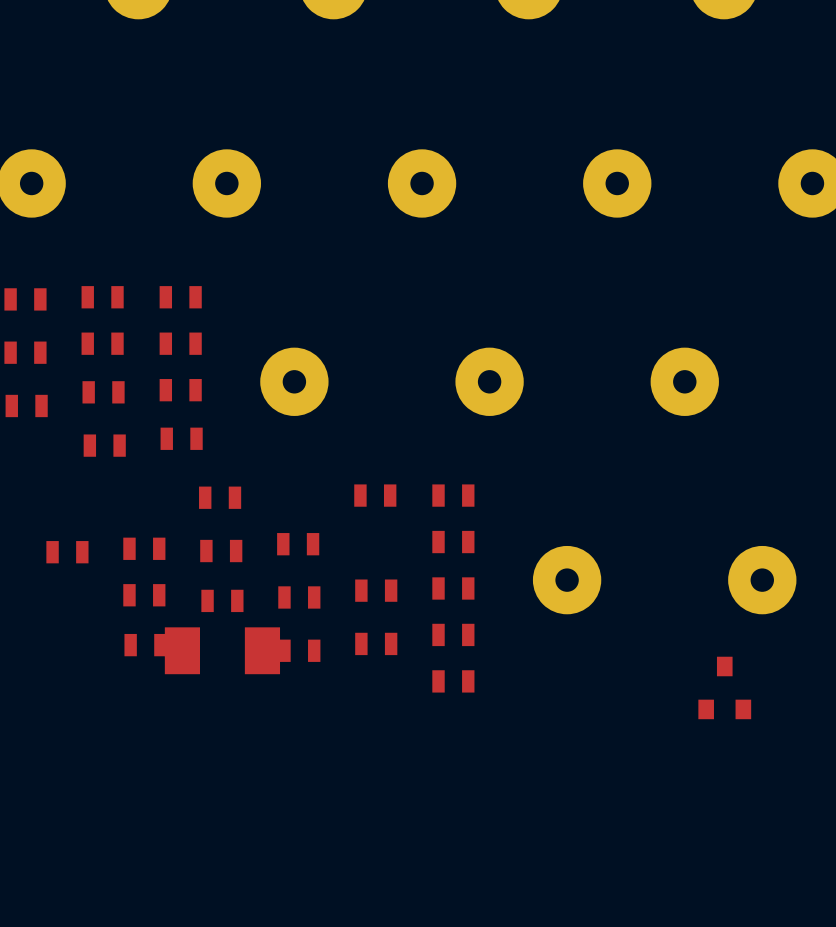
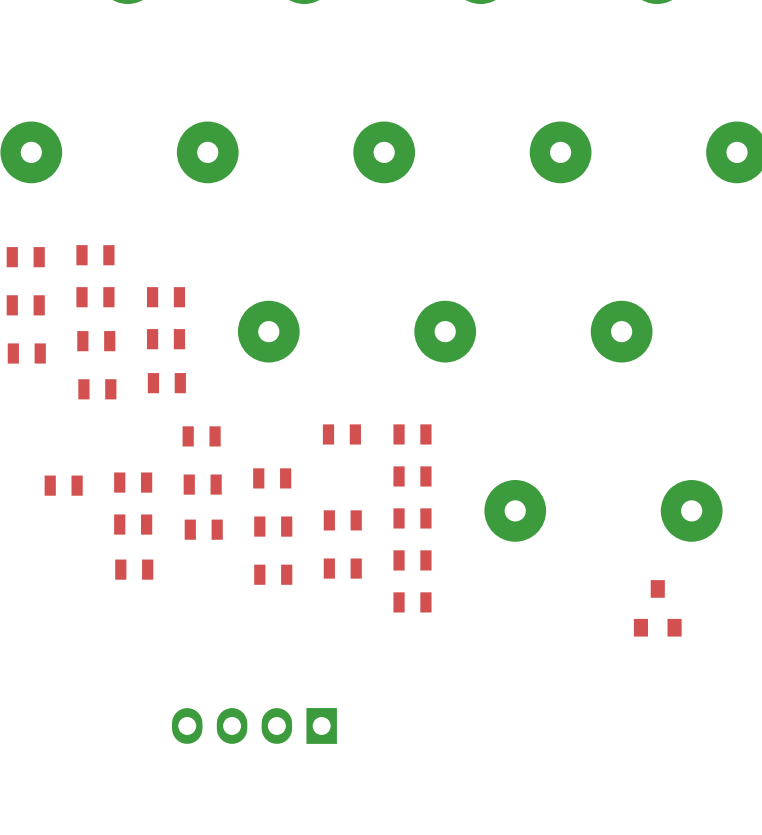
part: (180, 297) -> none
part: (222, 650) -> none
part: none -> (254, 725)

